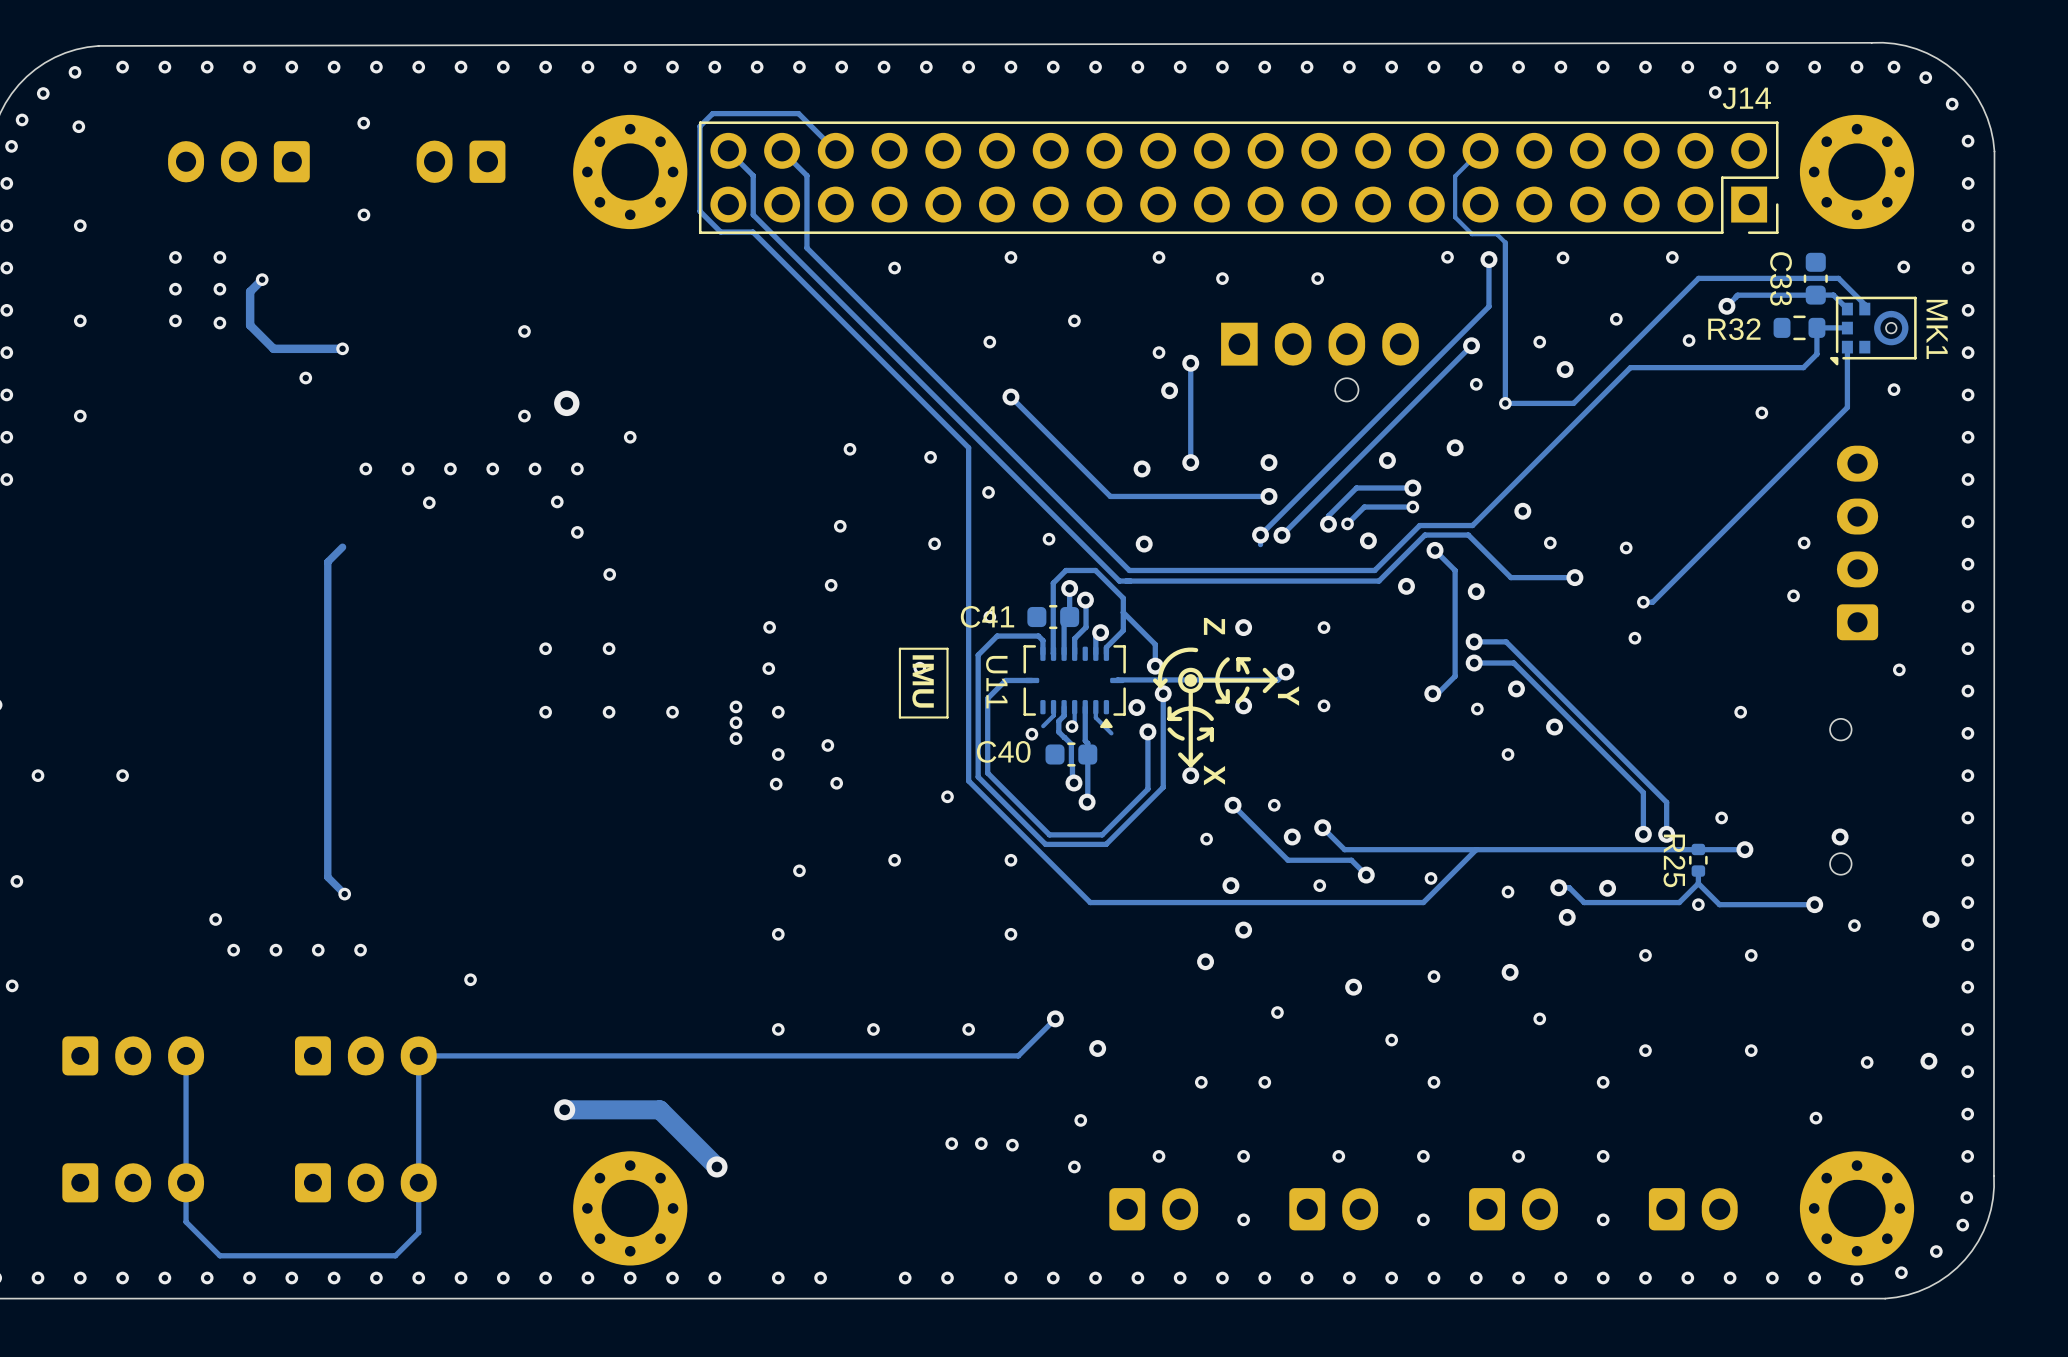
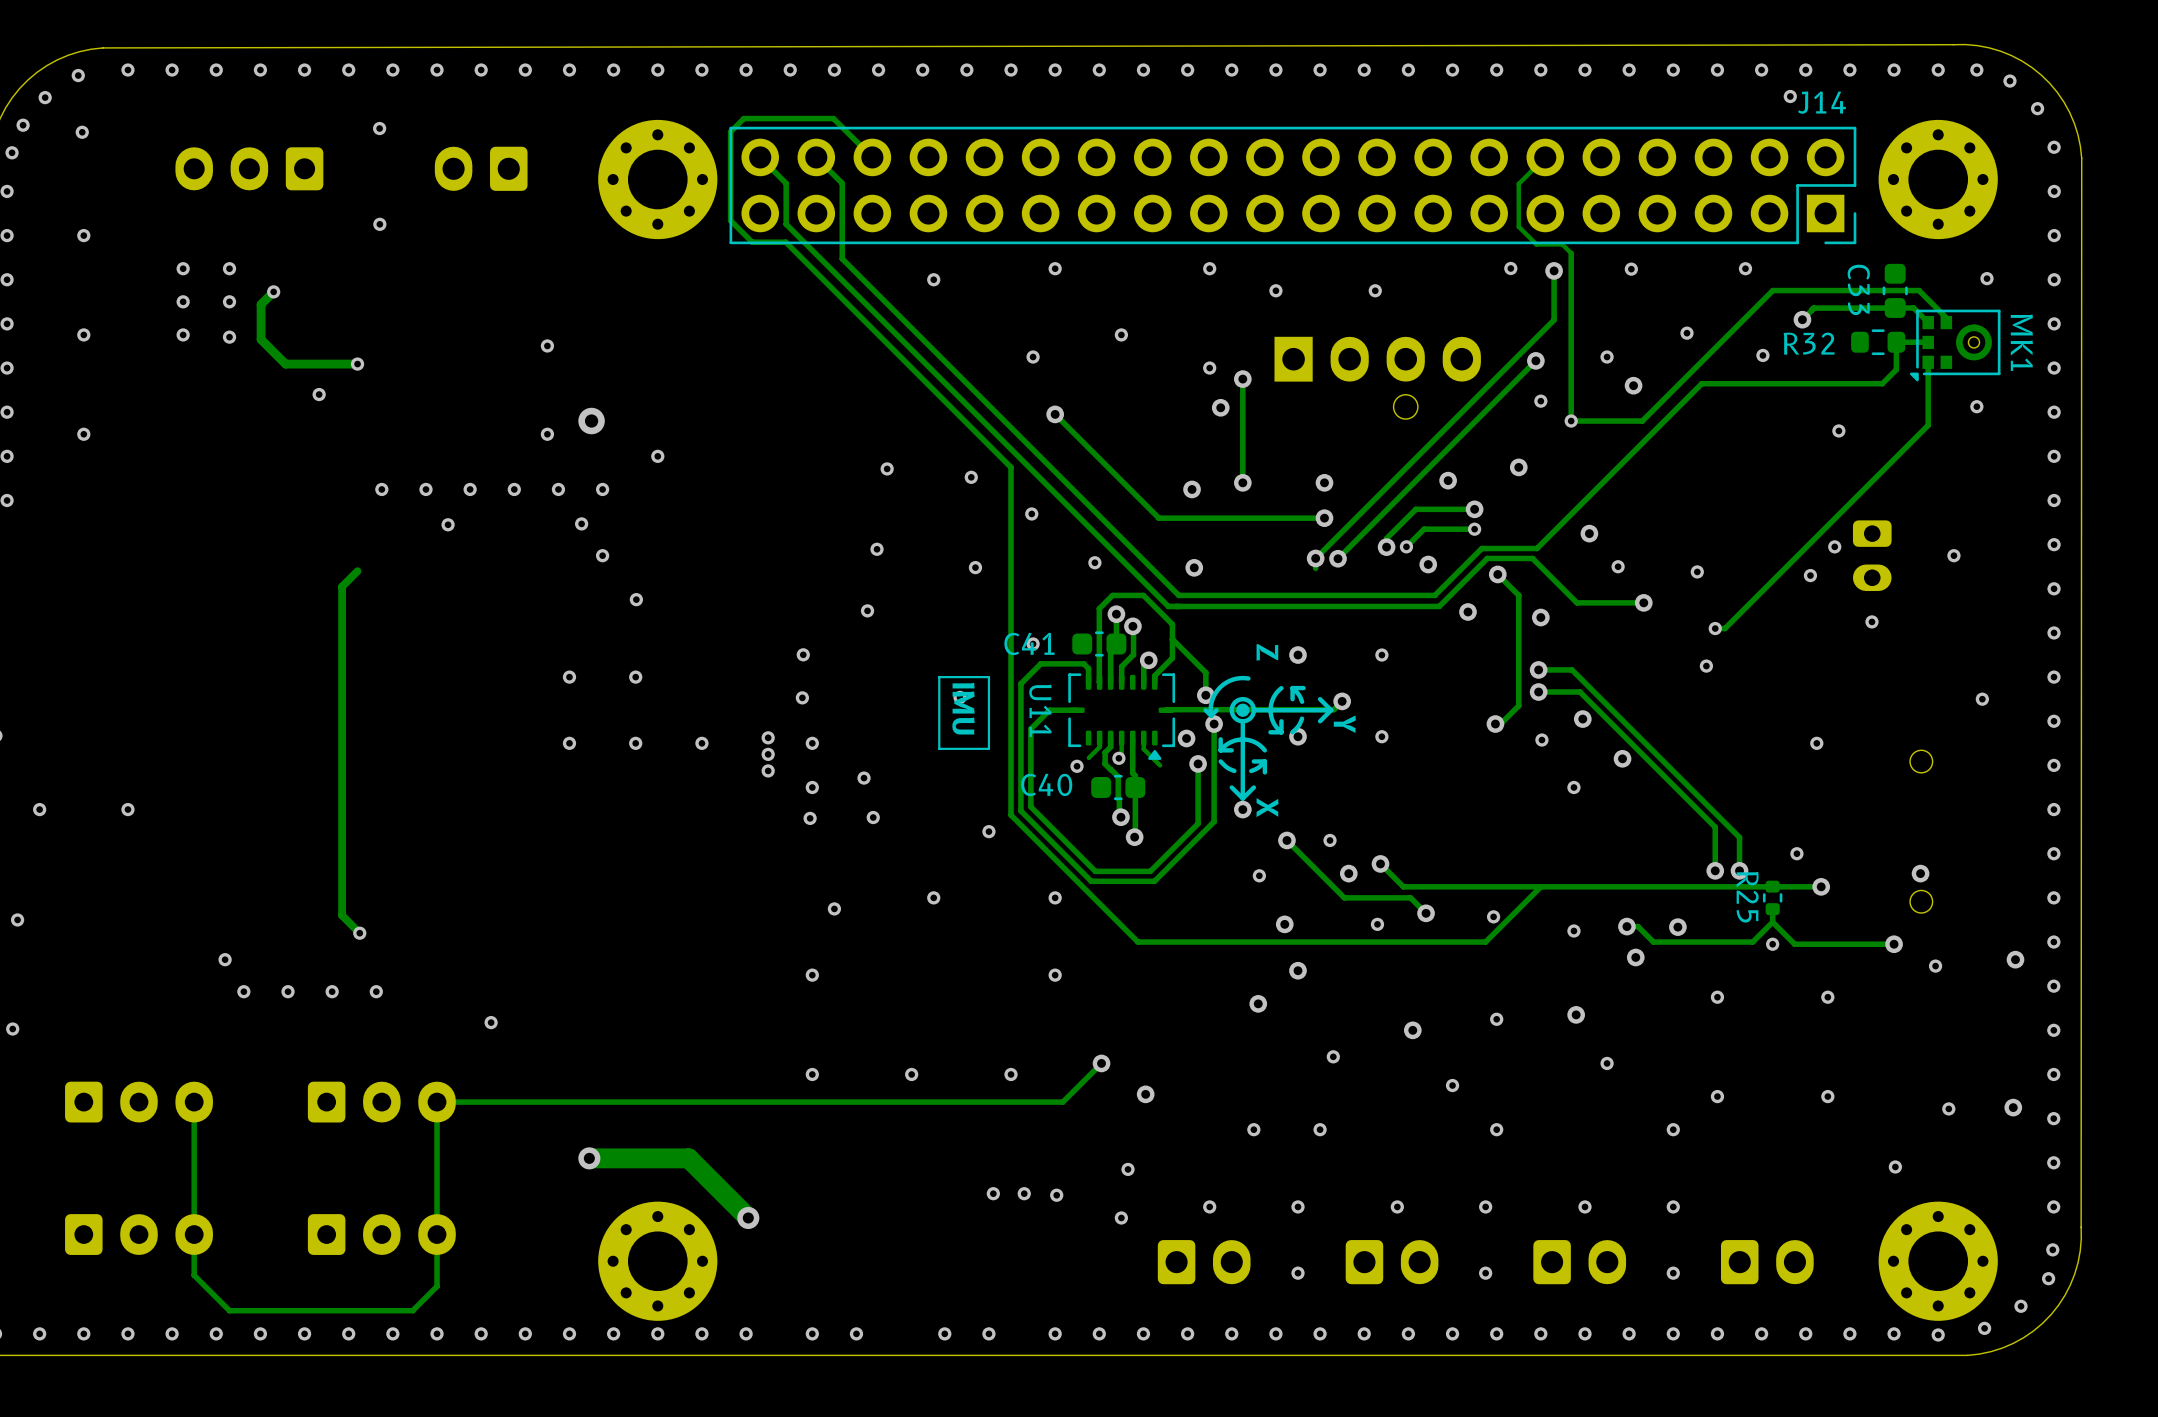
via: none -> (1834, 546)
part: none -> (1872, 555)
via: none -> (1953, 555)
via: (1804, 542) -> none
part: (1857, 542) -> none
via: none -> (1810, 575)

